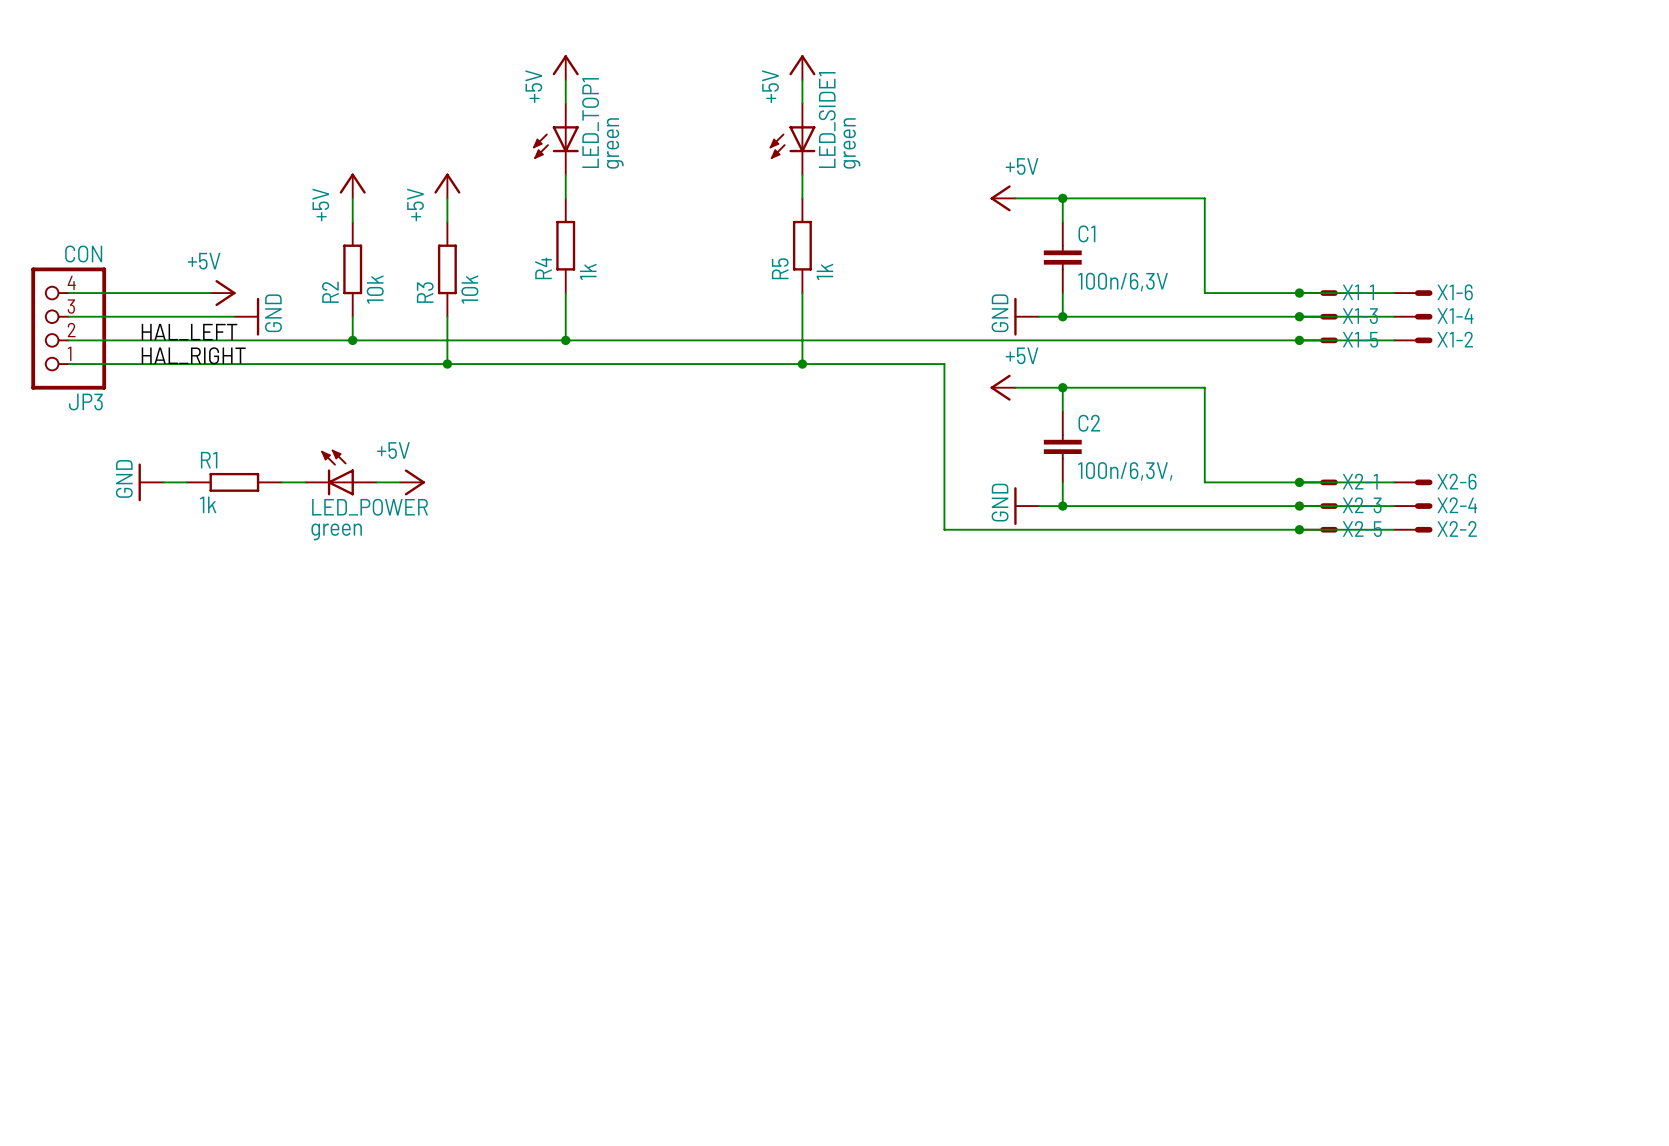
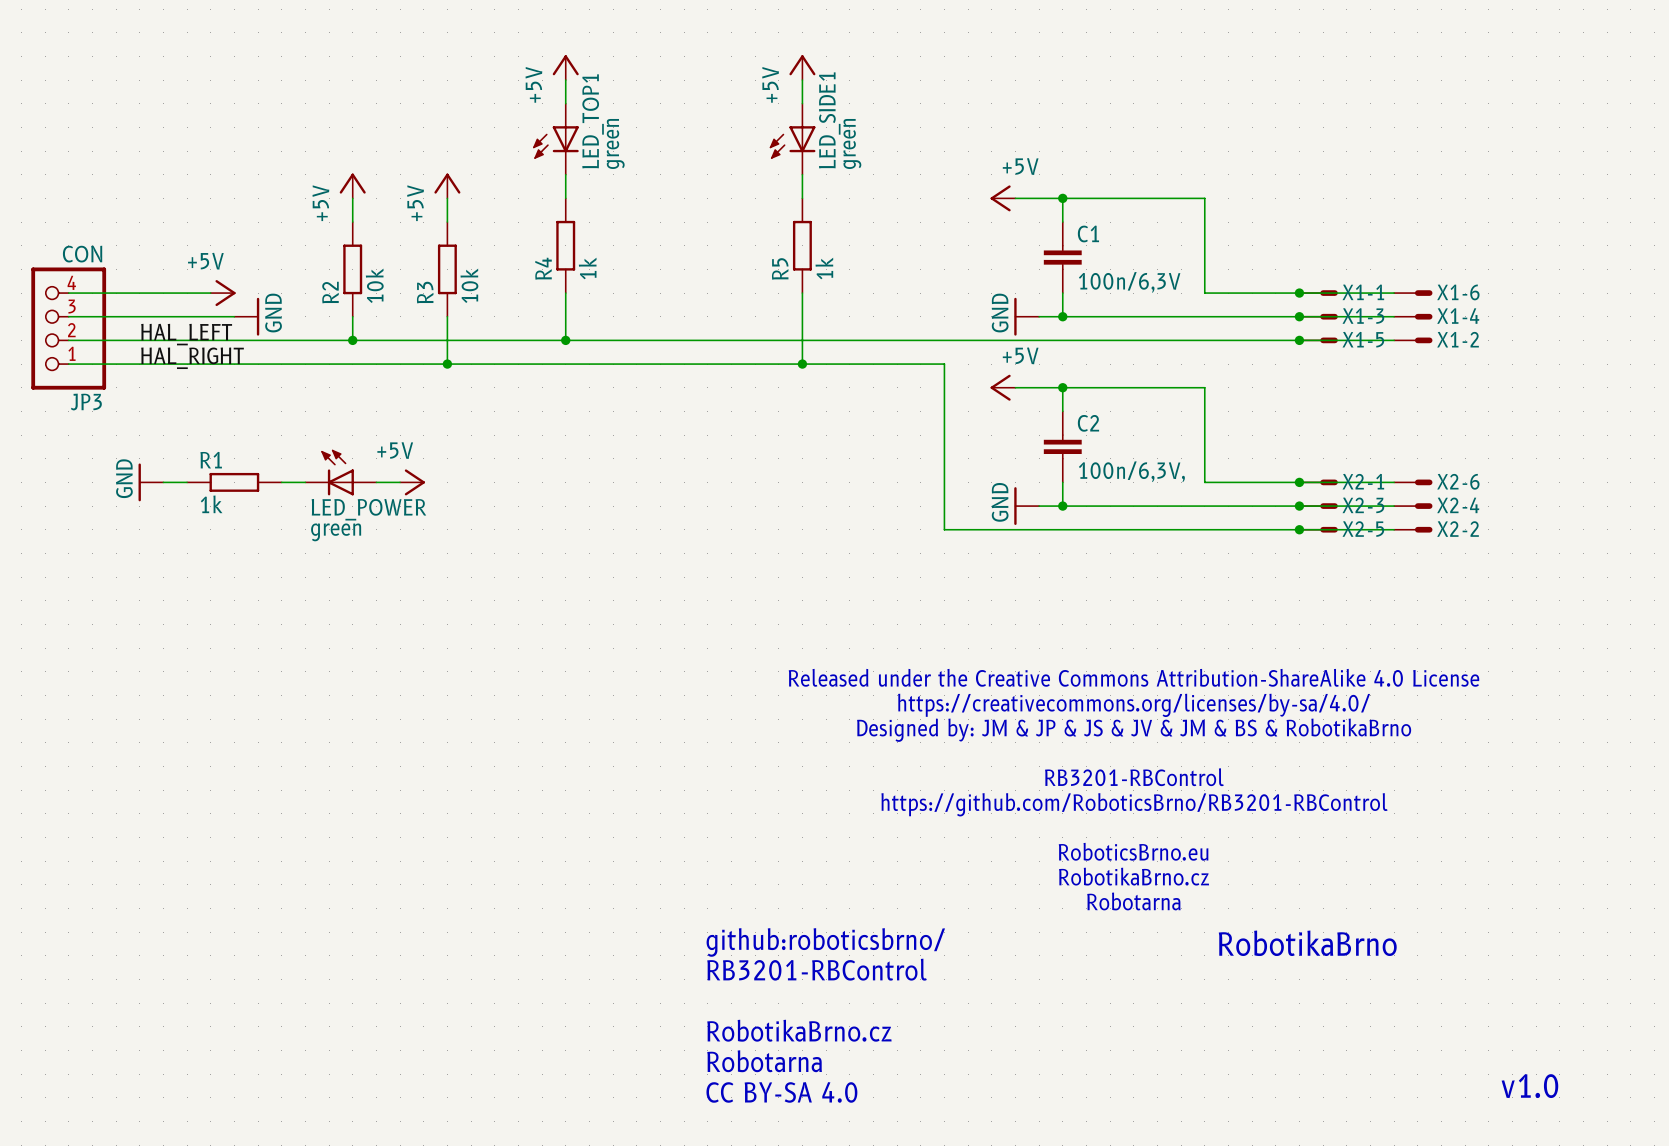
text: none -> Released under the Creative Commons Attribution-ShareAlike 4.0 License (1133, 677)
text: none -> https://creativecommons.org/licenses/by-sa/4.0/ (1134, 705)
text: none -> Designed by: JM & JP & JS & JV & JM & BS & RobotikaBrno (1134, 730)
text: none -> RB3201-RBControl (1134, 777)
text: none -> https://github.com/RoboticsBrno/RB3201-RBControl (1134, 804)
text: none -> RoboticsBrno.eu (1133, 851)
text: none -> RobotikaBrno.cz (1134, 876)
text: none -> Robotarna (1133, 901)
text: none -> github:roboticsbrno/ (825, 942)
text: none -> RobotikaBrno (1307, 943)
text: none -> RB3201-RBControl (817, 969)
text: none -> RobotikaBrno.cz (799, 1030)
text: none -> Robotarna (764, 1061)
text: none -> v1.0 (1529, 1086)
text: none -> CC BY-SA 4.0 (781, 1092)

